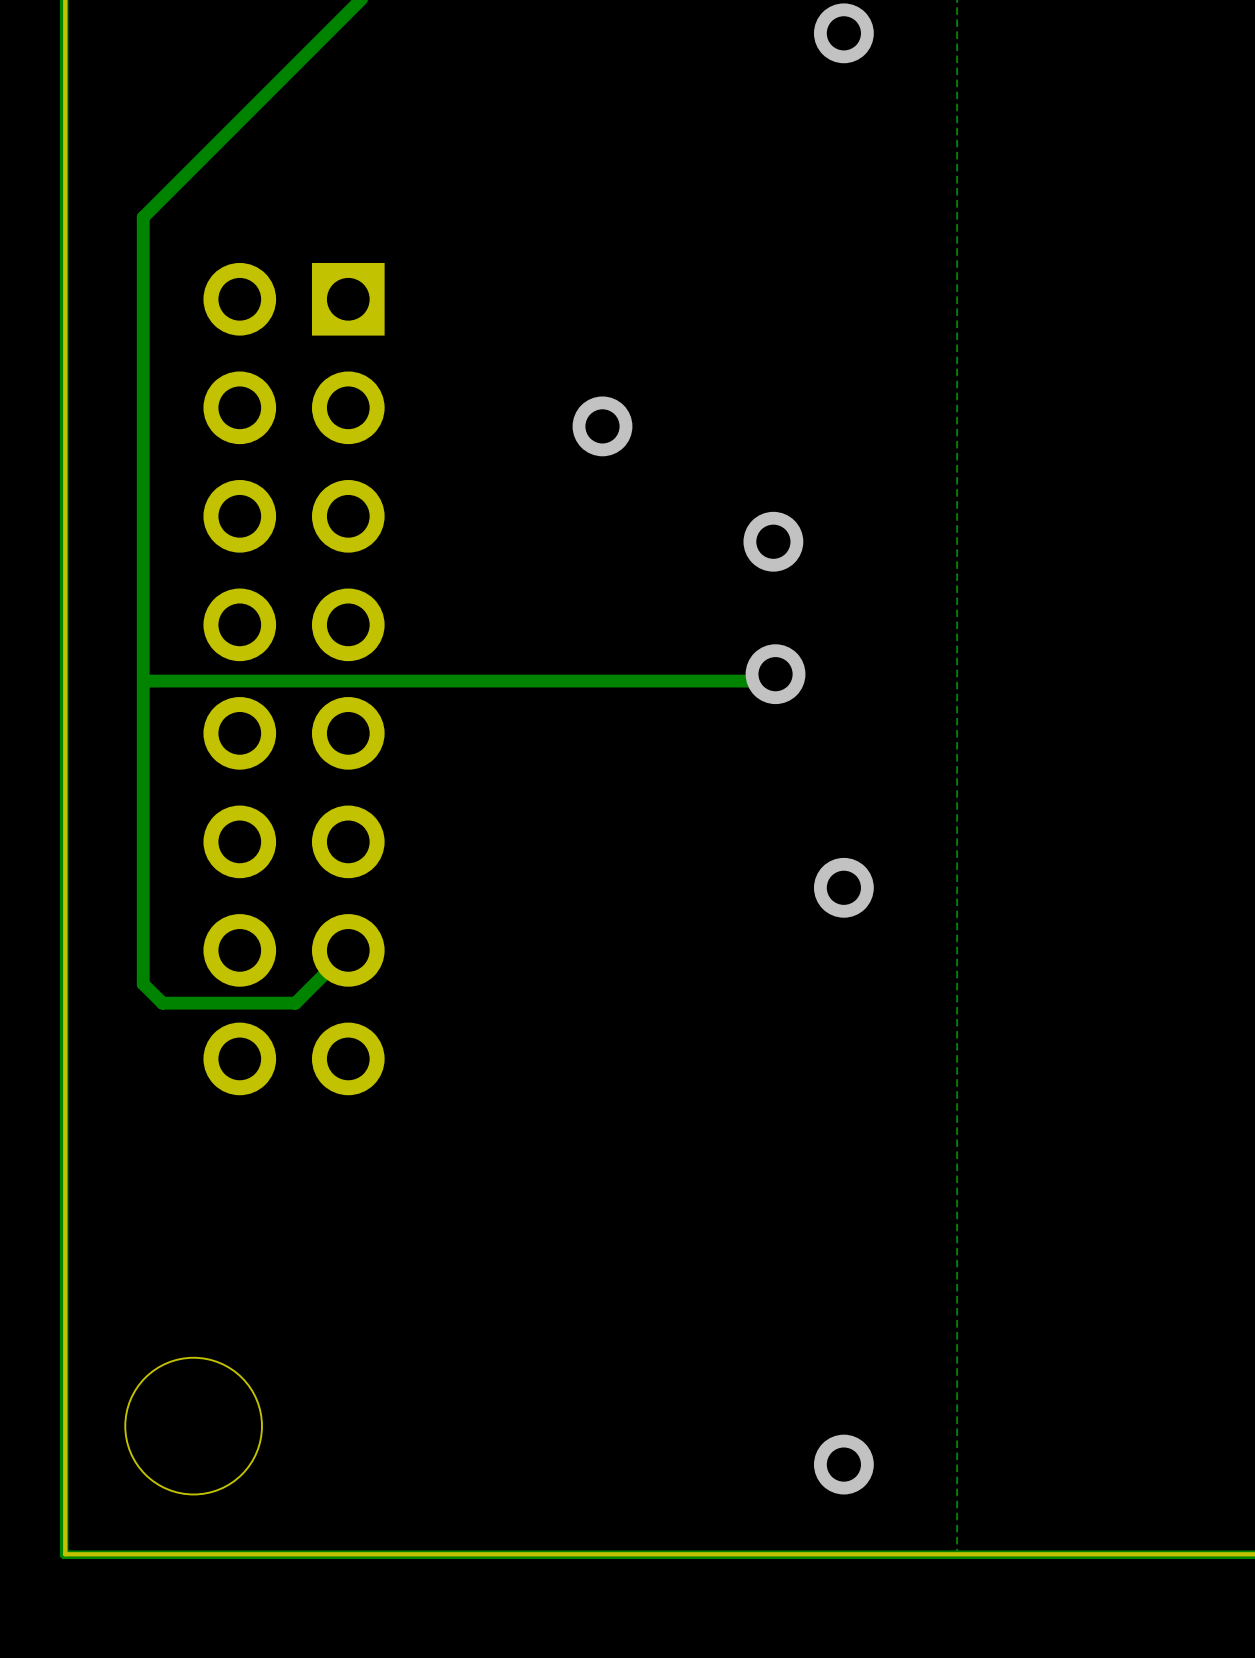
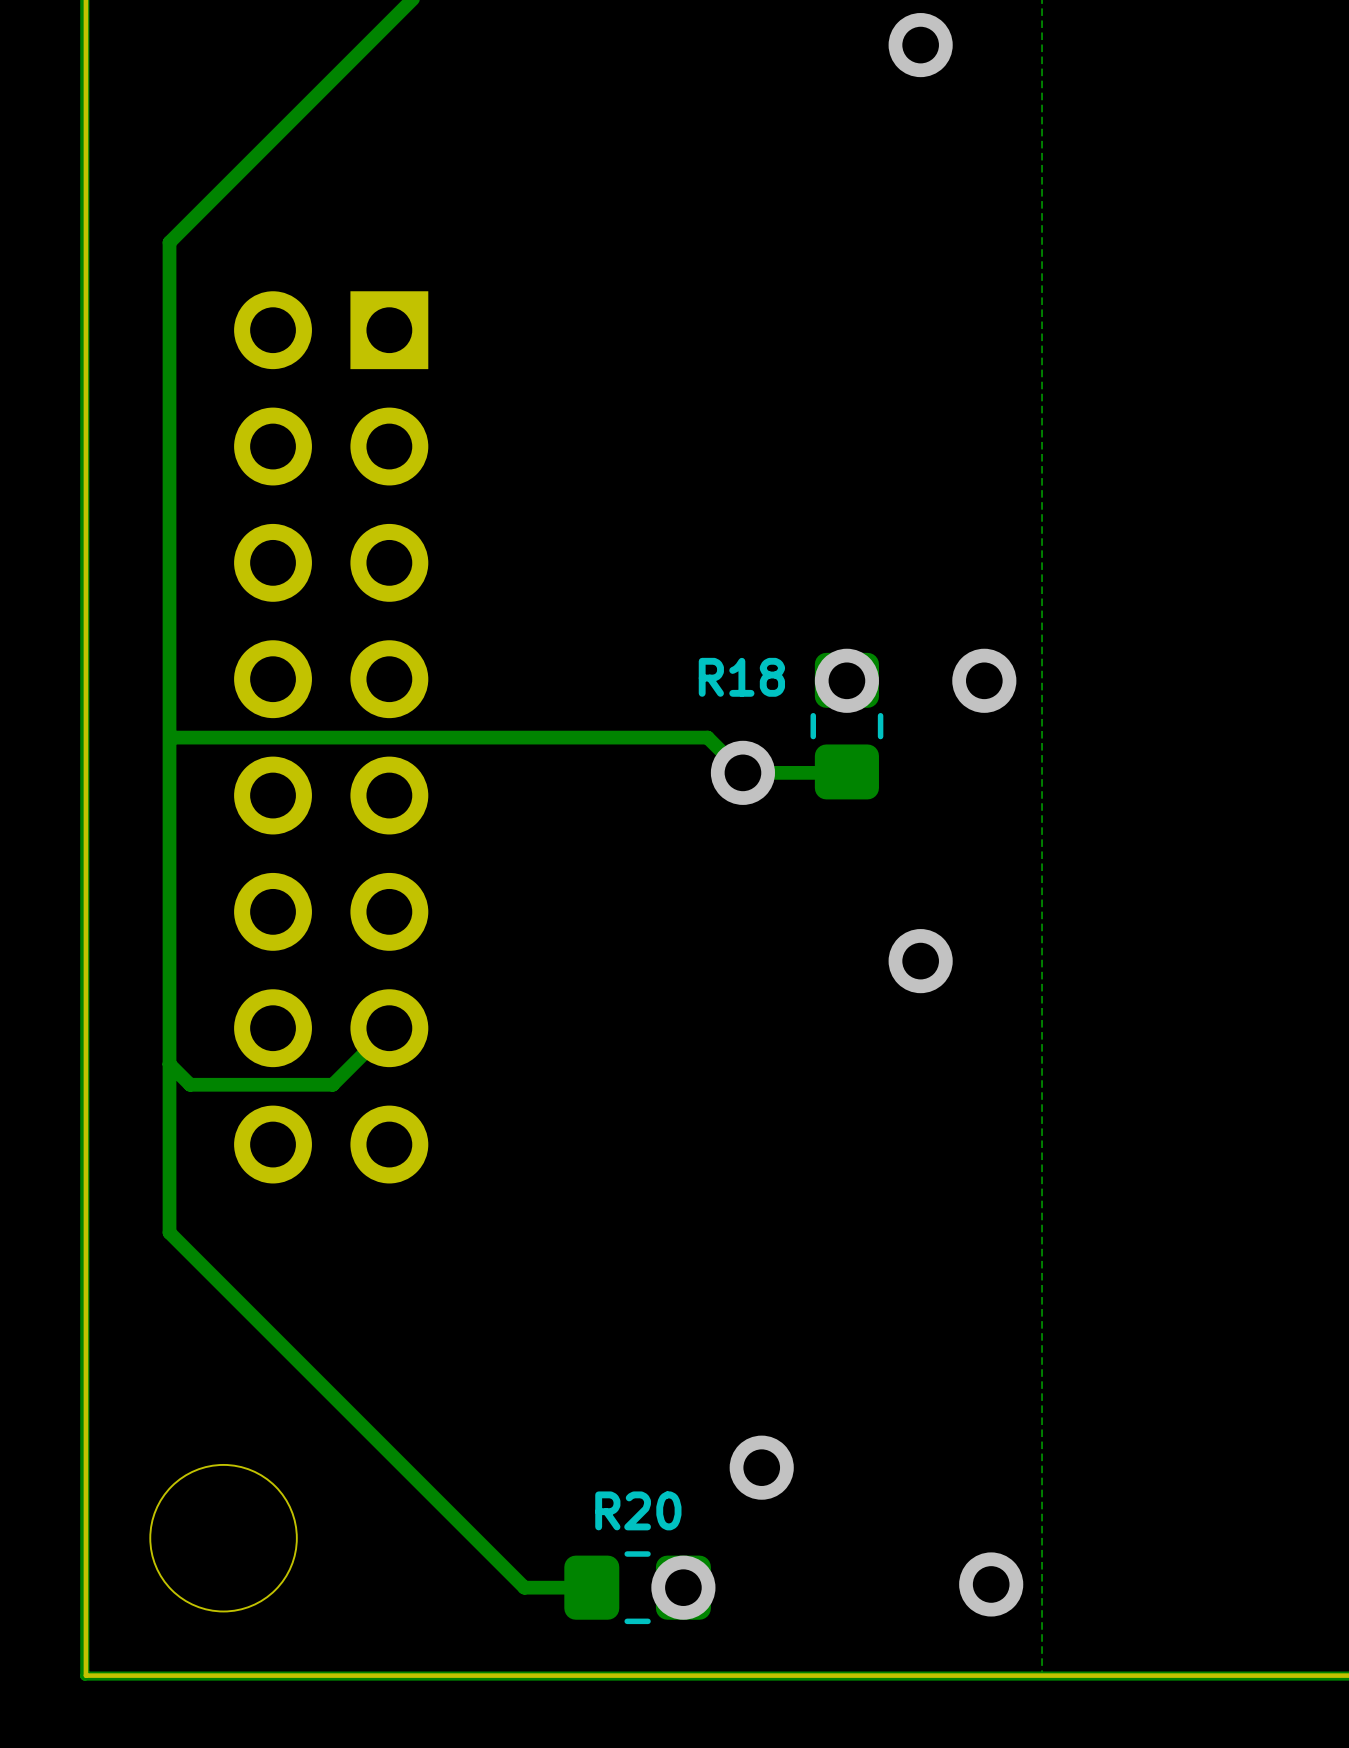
via: (602, 426) -> none
via: (773, 541) -> none
via: none -> (846, 680)
via: none -> (984, 680)
R18: none -> (846, 726)
track: (775, 674) (768, 681) (143, 681) -> (846, 771) (742, 772) (707, 737) (171, 737) (170, 739)
via: (775, 674) -> none
via: none -> (742, 772)
track: none -> (169, 1064) (169, 1232) (524, 1587) (591, 1587)
via: none -> (761, 1467)
via position: (843, 1464) -> (991, 1584)
R20: none -> (637, 1587)
via: none -> (683, 1587)

